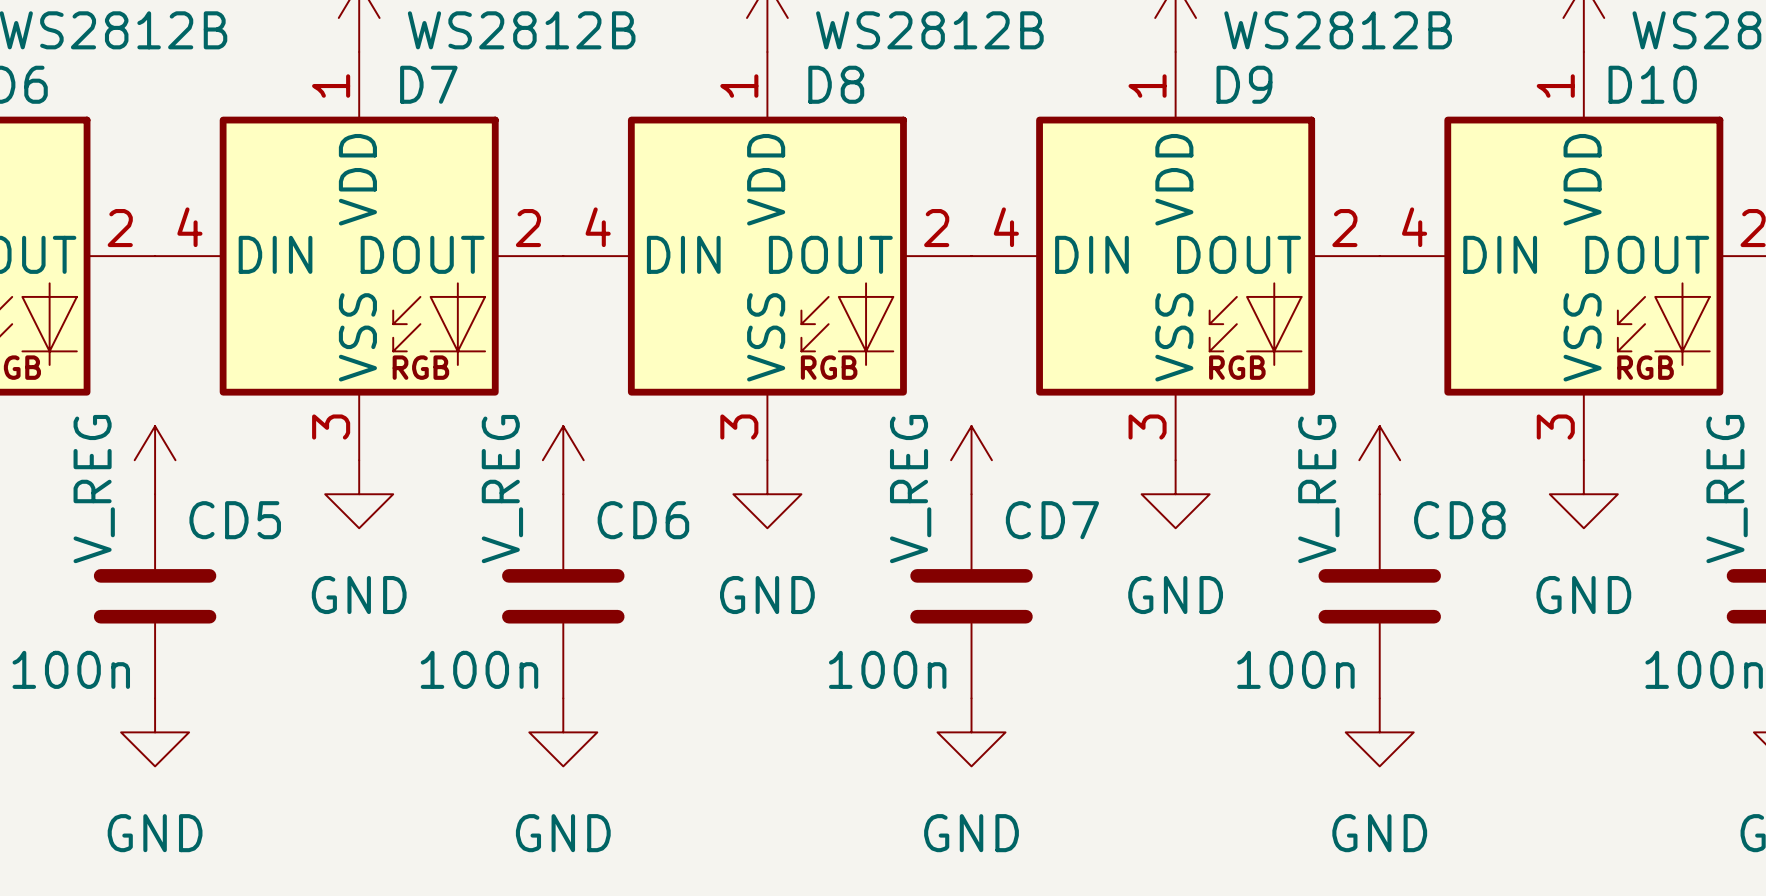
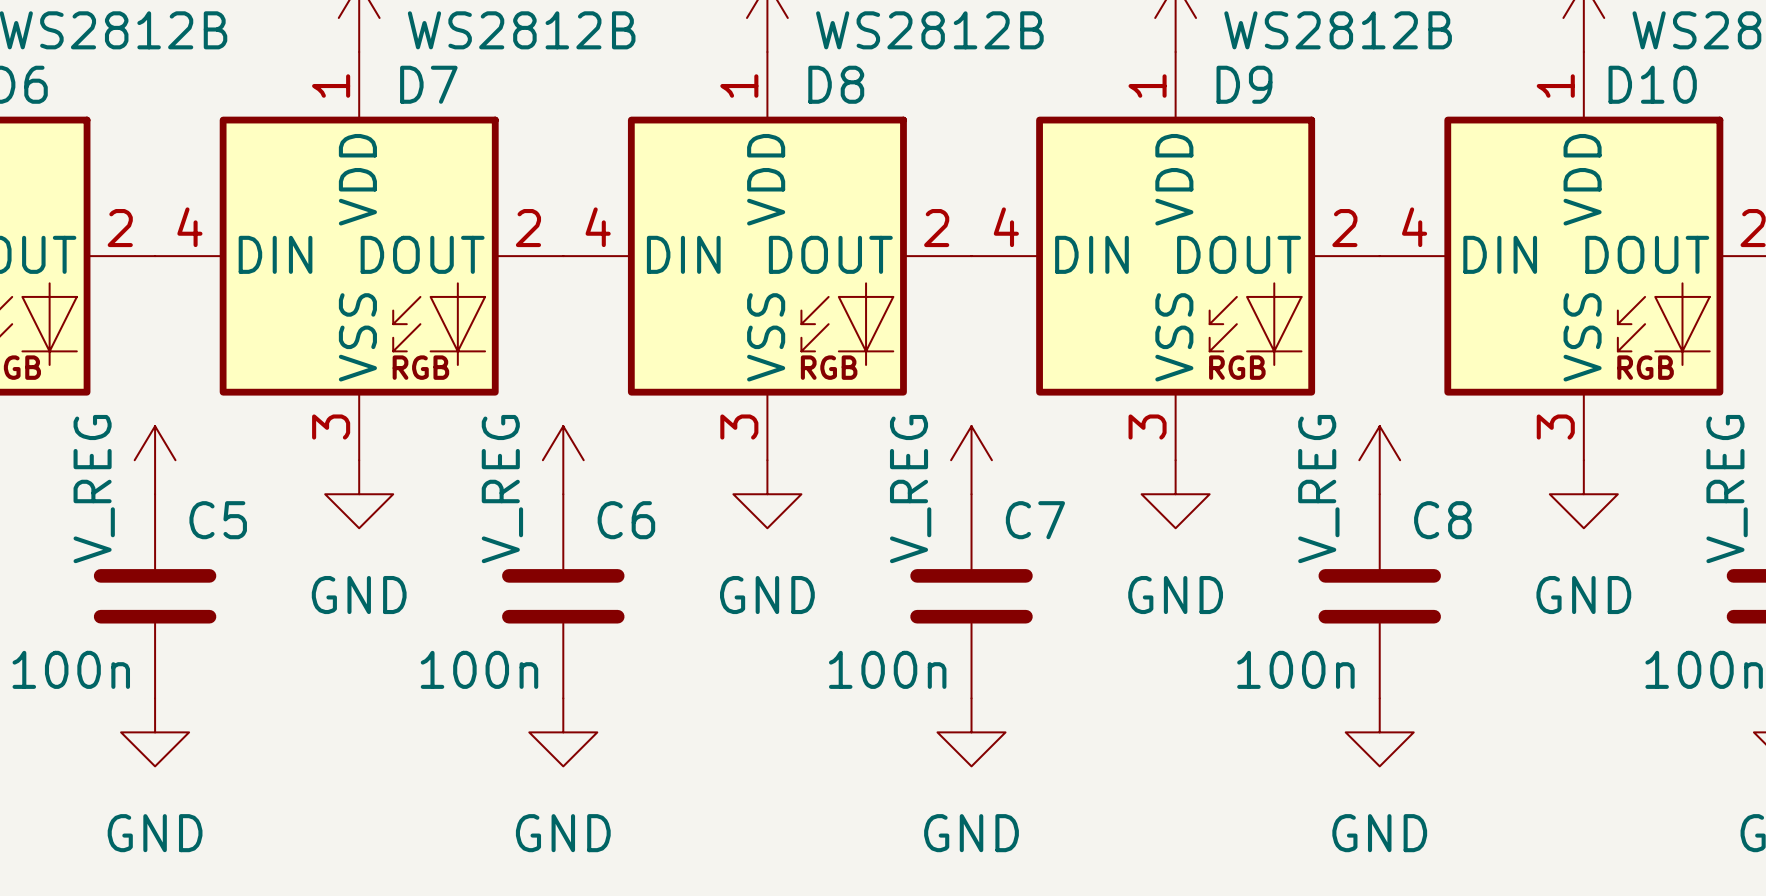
CD5 name: CD5 (235, 520) -> C5 (218, 520)
CD6 name: CD6 (643, 520) -> C6 (626, 520)
CD7 name: CD7 (1052, 520) -> C7 (1035, 520)
CD8 name: CD8 (1459, 520) -> C8 (1442, 520)

